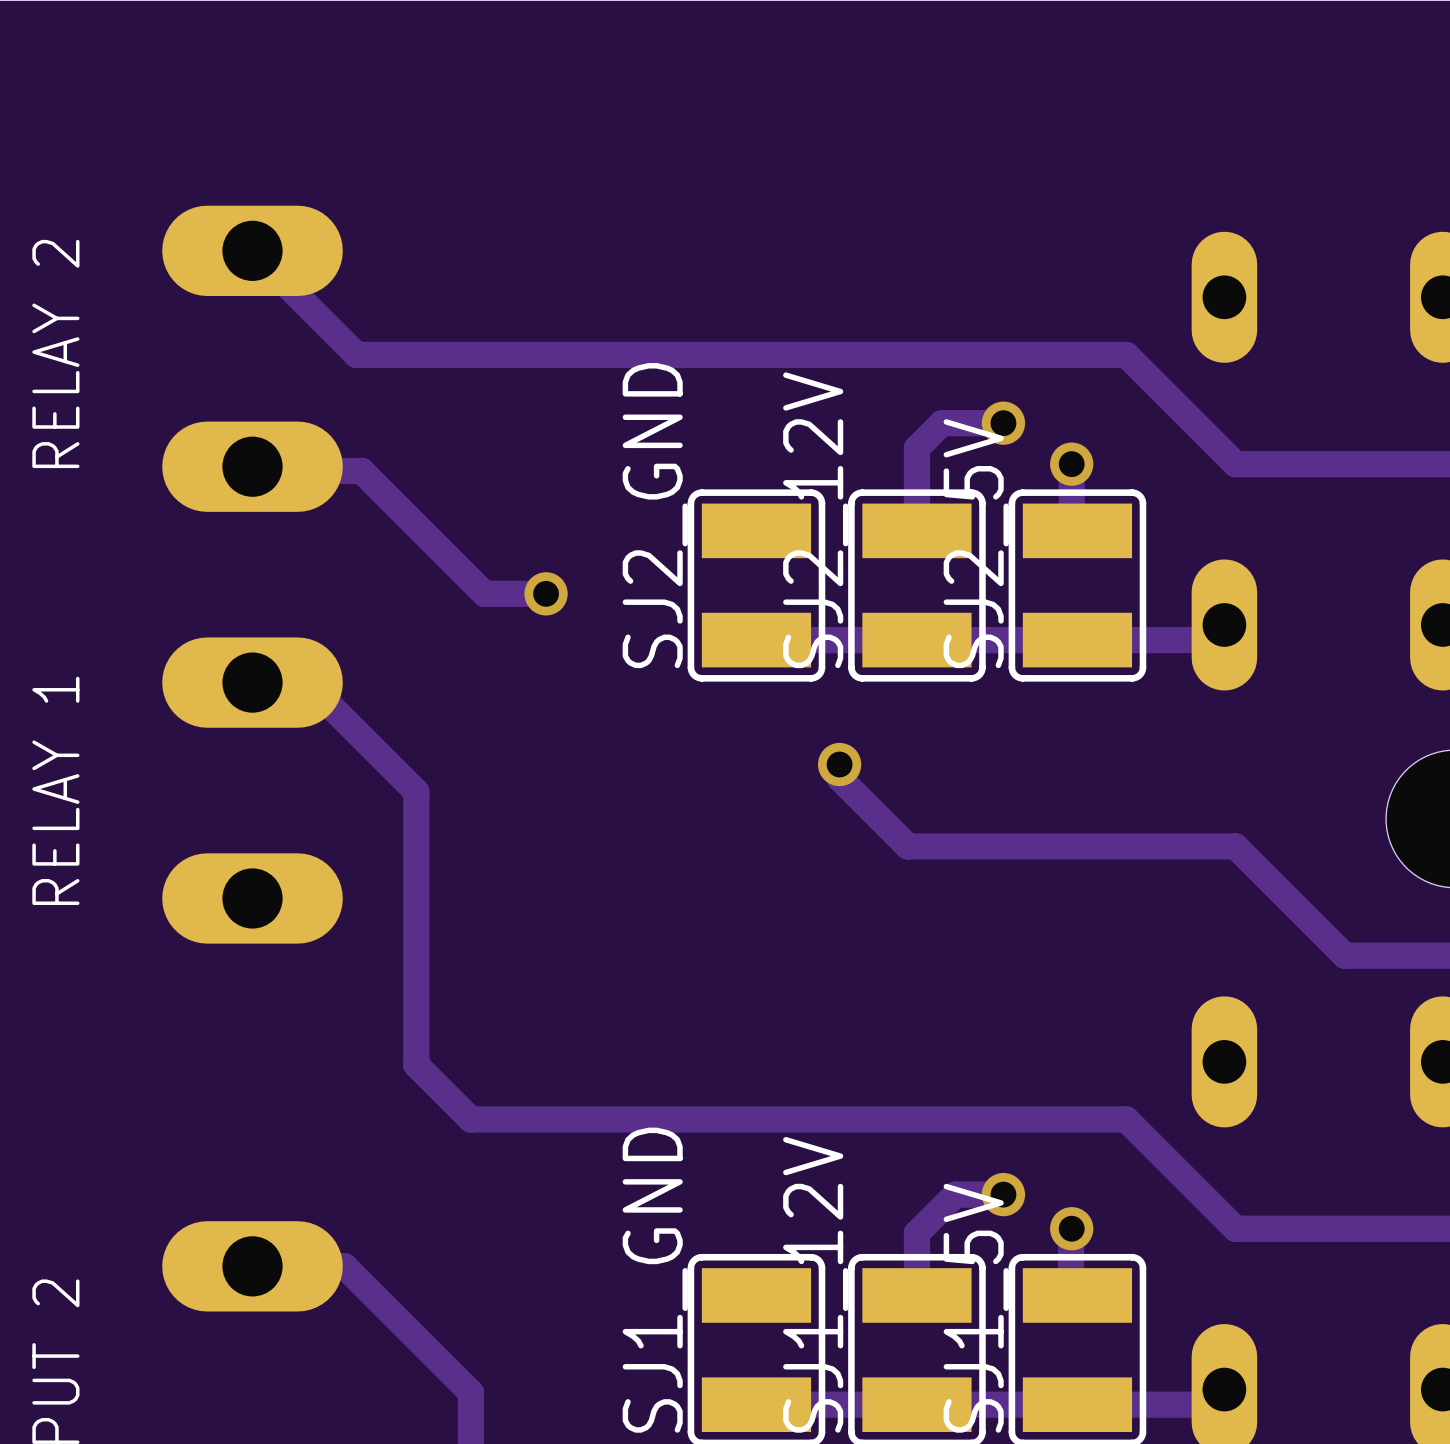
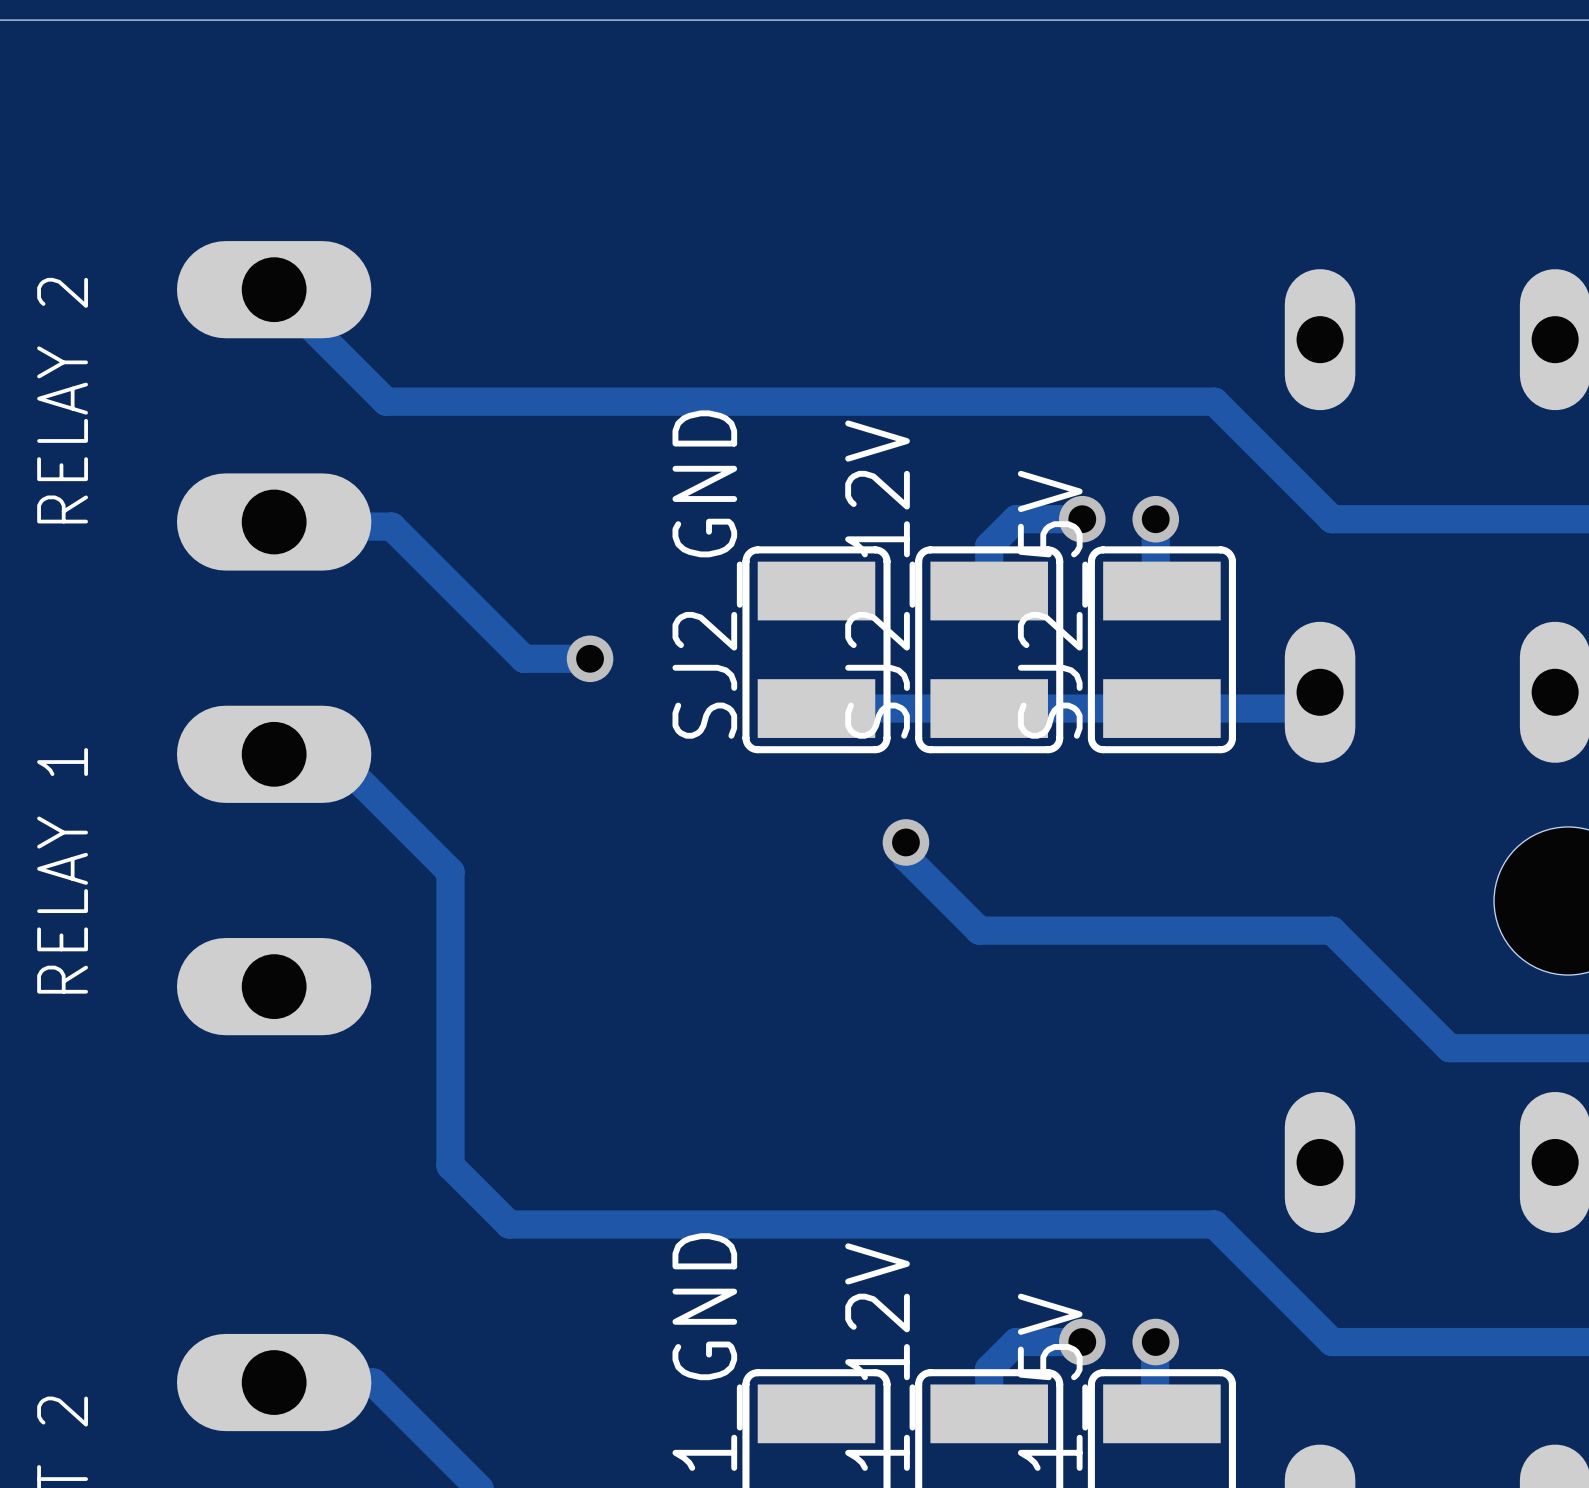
track: (1003, 423) (942, 423) (916, 448) (916, 489) -> (1082, 519) (1016, 519) (989, 546)
via position: (1003, 423) -> (1082, 519)
track: (1003, 1194) (955, 1194) (916, 1233) (916, 1253) -> (1082, 1342) (1016, 1342) (989, 1369)
via position: (1003, 1194) -> (1082, 1342)

